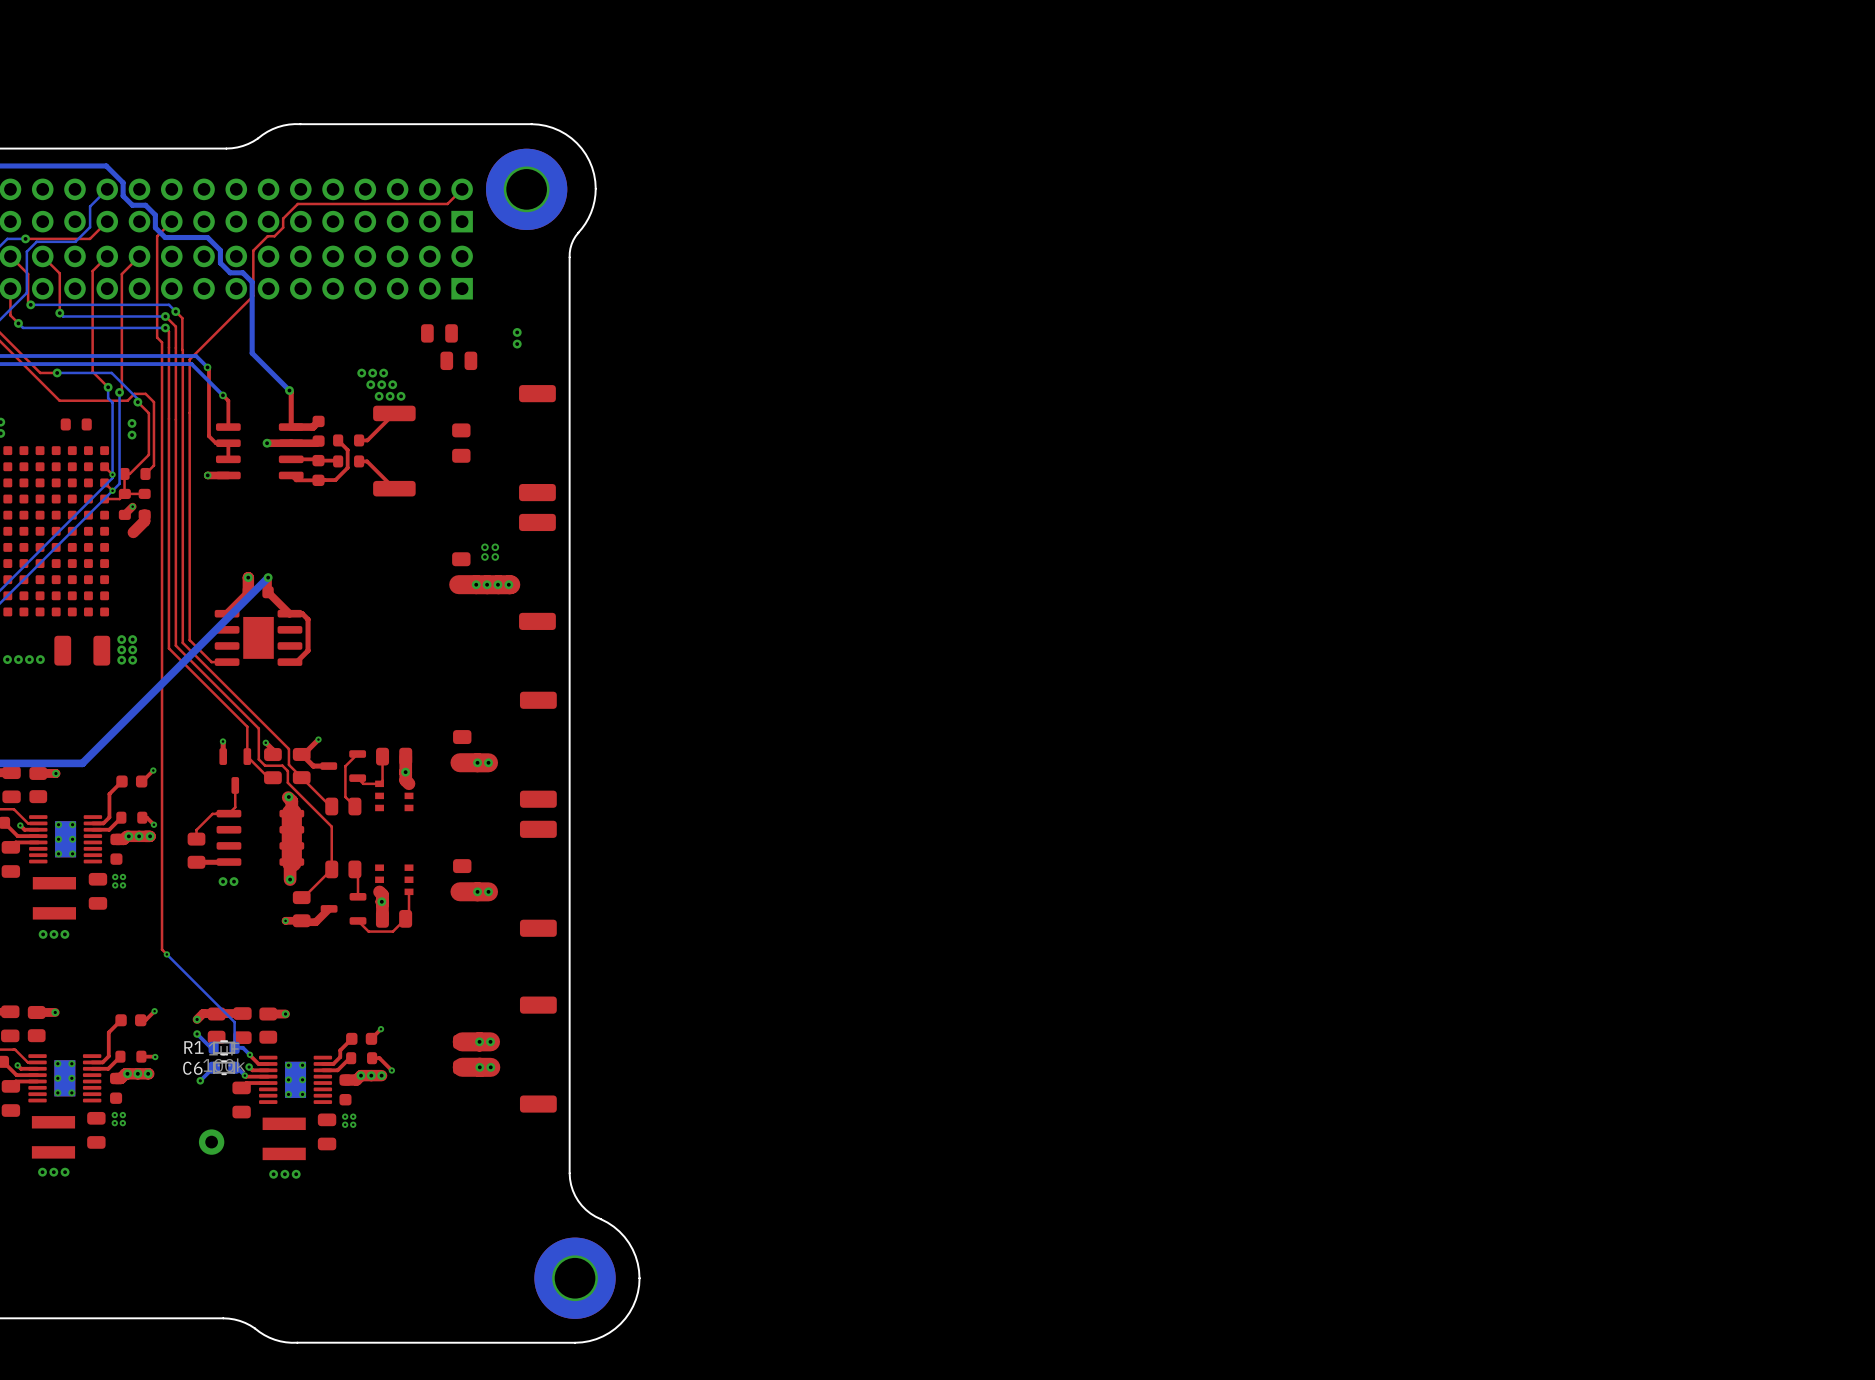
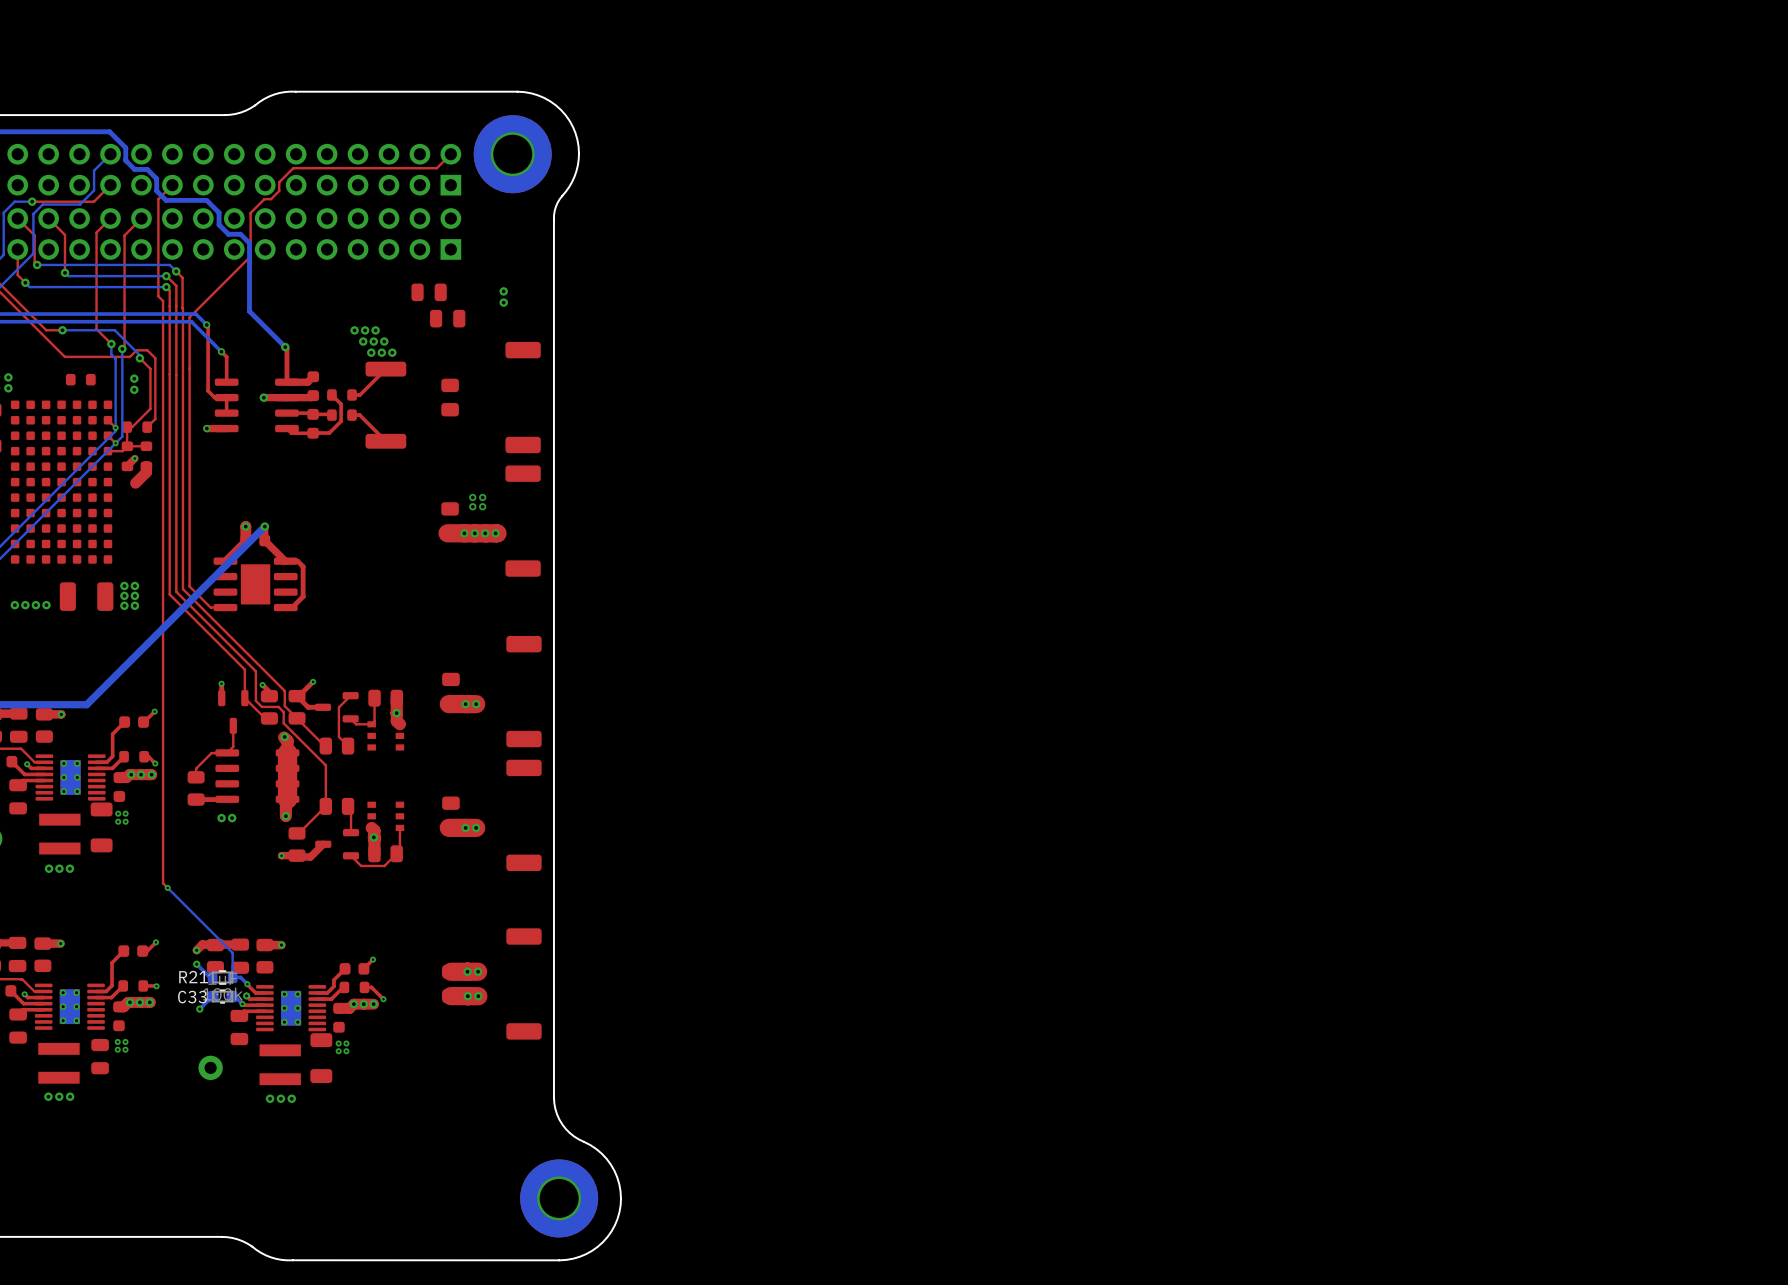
part footprint: [88, 872, 108, 910] -> [90, 802, 113, 853]
R1 name: R1 (193, 1047) -> R21 (193, 977)
C6 name: C6 (192, 1068) -> C33 (192, 997)
part footprint: [317, 1113, 337, 1151] -> [310, 1033, 333, 1084]

